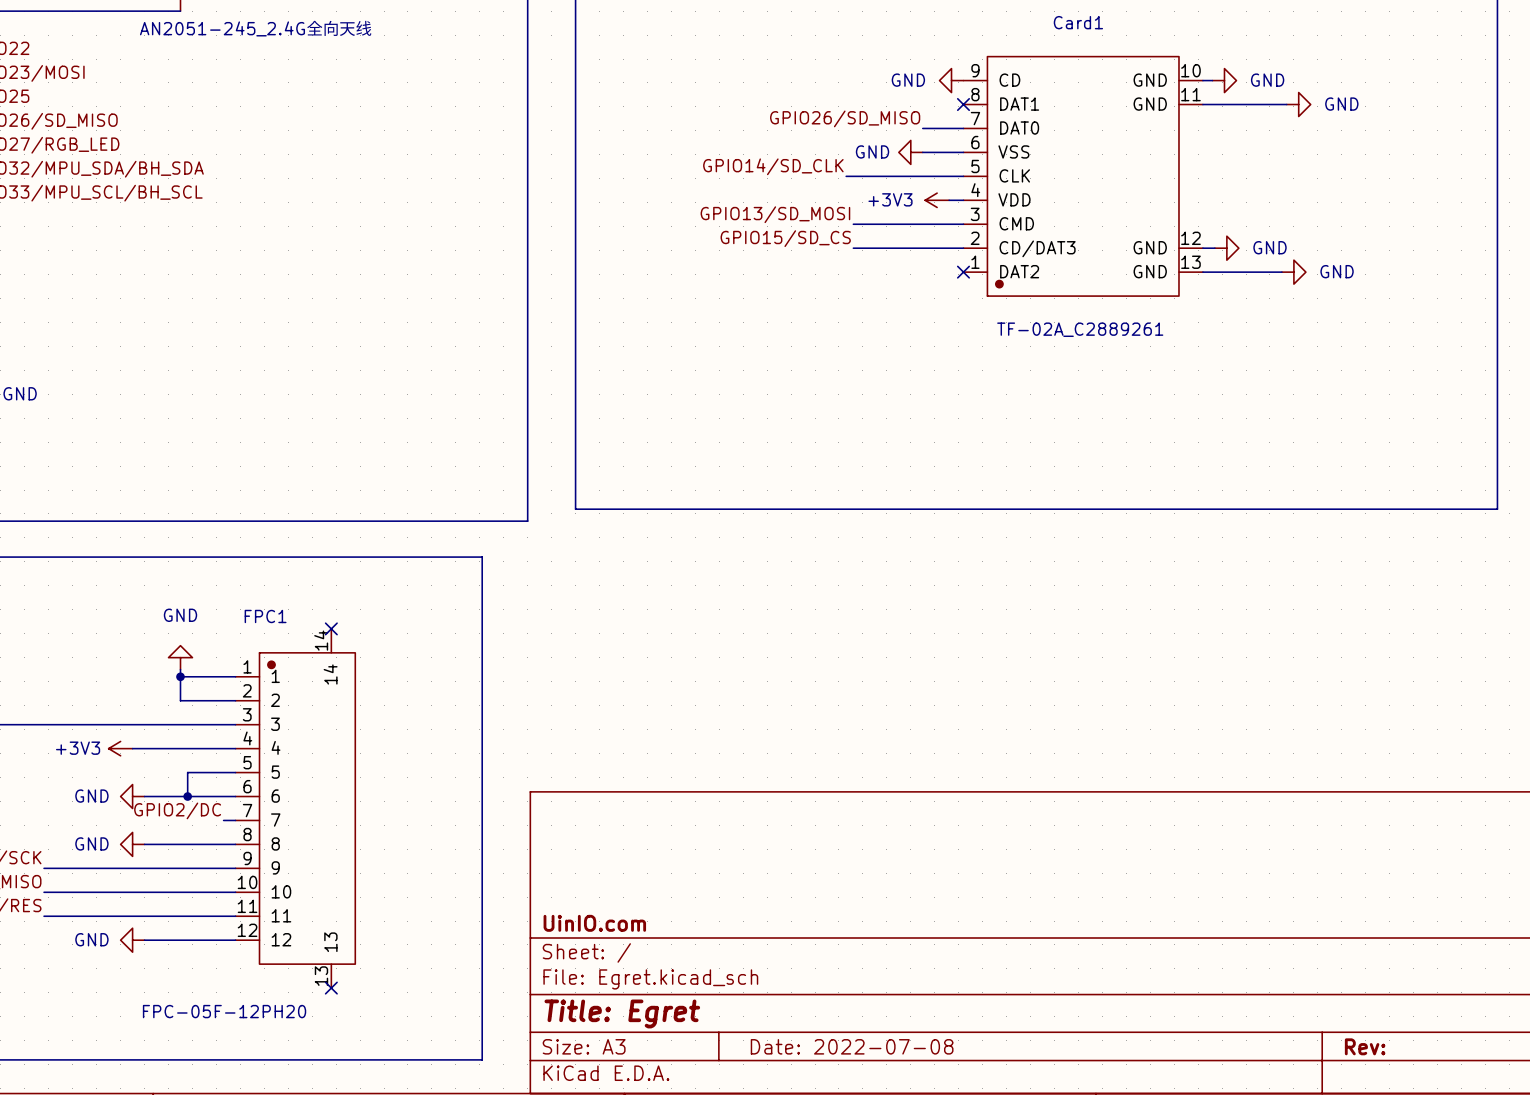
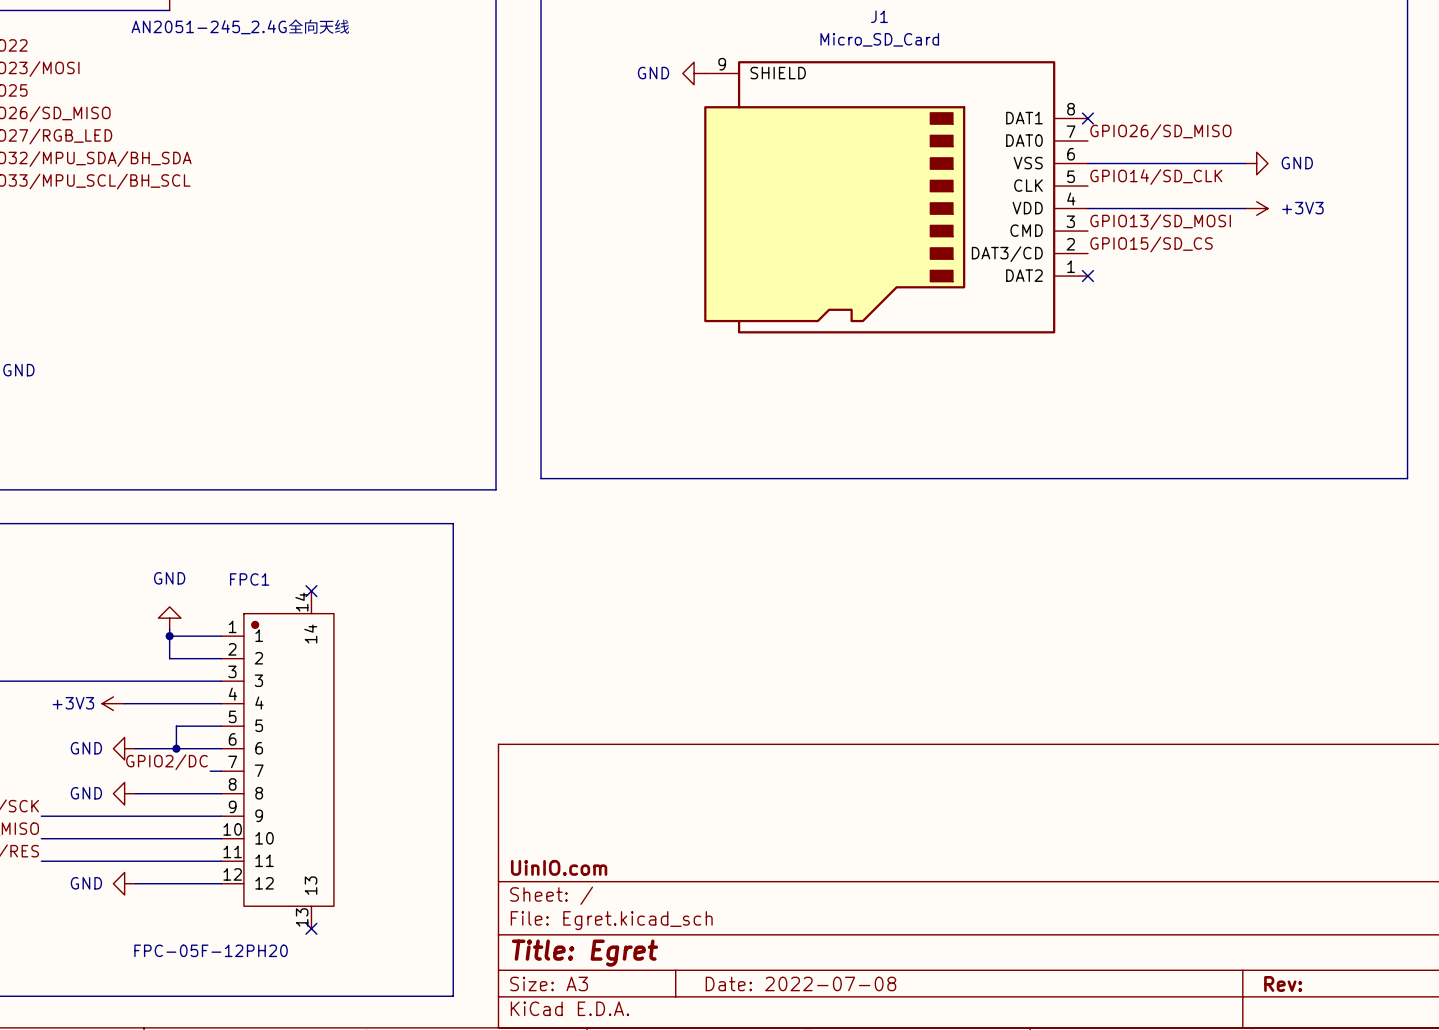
power symbol: none -> GND (694, 73)
power symbol: GND (951, 80) -> none
wire: (1202, 80) (1212, 80) -> none
power symbol: GND (1224, 80) -> none
no-connect mark: (963, 104) -> none
wire: (1202, 104) (1286, 104) -> none
power symbol: GND (1298, 104) -> none
label position: GPIO26/SD_MISO (845, 118) -> GPIO26/SD_MISO (1160, 132)
no-connect mark: none -> (1087, 118)
power symbol: GND (910, 152) -> none
label: GPIO14/SD_CLK (773, 166) -> none
wire: none -> (1087, 163) (1245, 163)
power symbol: none -> GND (1256, 163)
Card1: TF-02A_C2889261 (1083, 176) -> none
label: none -> GPIO14/SD_CLK (1156, 177)
power symbol: +3V3 (937, 200) -> none
J1: none -> Micro_SD_Card (896, 197)
label: GPIO13/SD_MOSI (775, 214) -> none
wire: none -> (1087, 208) (1245, 208)
power symbol: none -> +3V3 (1256, 208)
label: none -> GPIO13/SD_MOSI (1160, 222)
label: GPIO15/SD_CS (785, 238) -> none
wire: (1202, 248) (1214, 248) -> none
power symbol: GND (1226, 248) -> none
label: none -> GPIO15/SD_CS (1151, 244)
no-connect mark: (963, 272) -> none
wire: (1202, 272) (1281, 272) -> none
power symbol: GND (1293, 272) -> none
no-connect mark: none -> (1087, 276)

